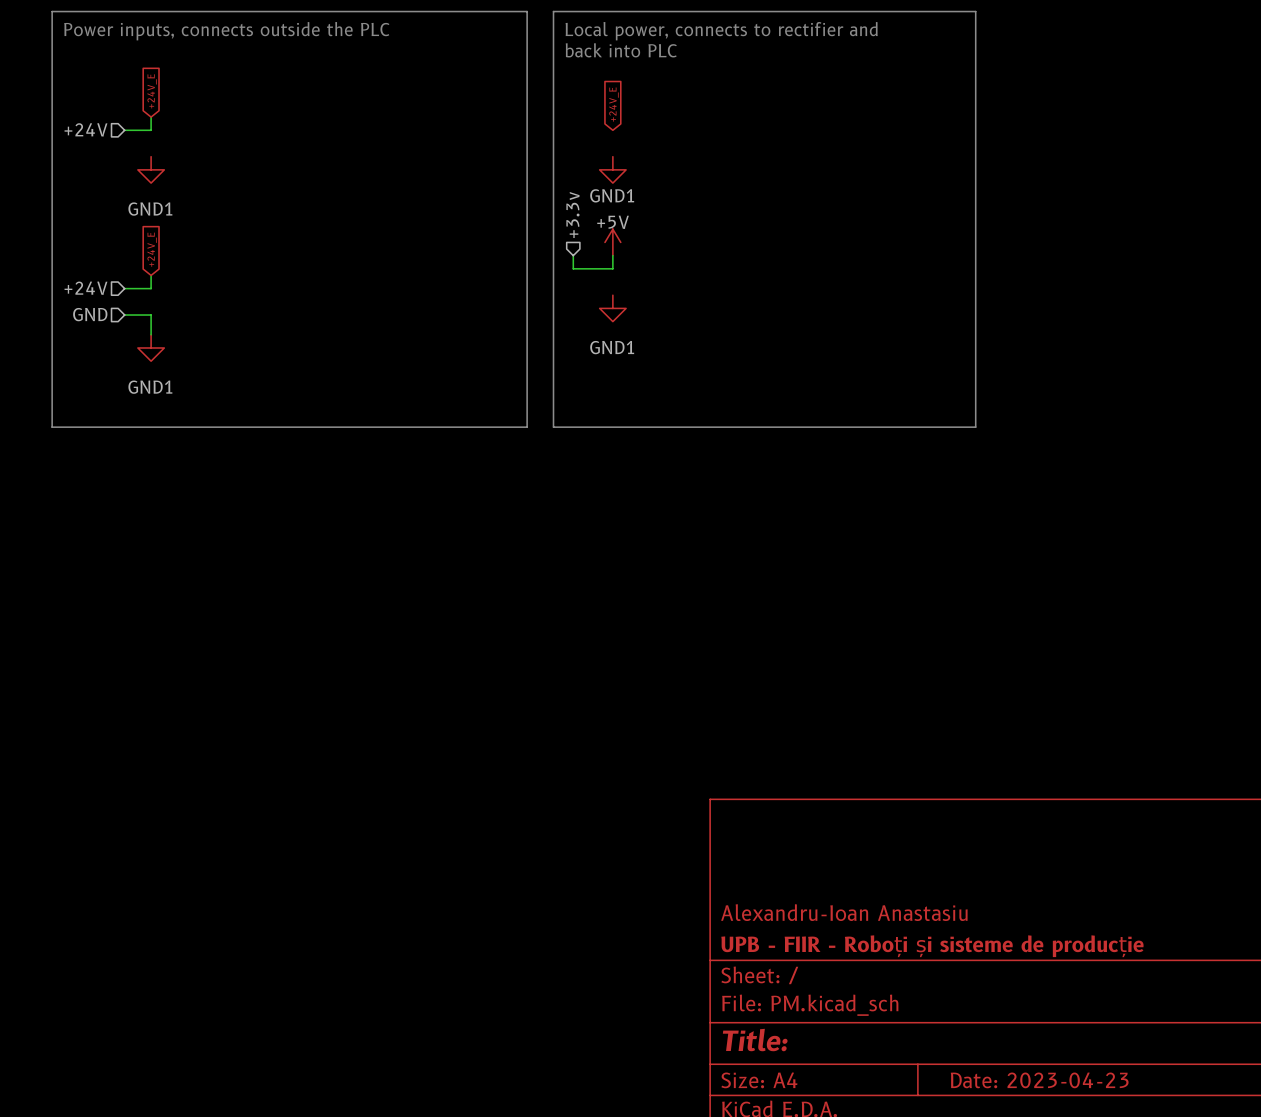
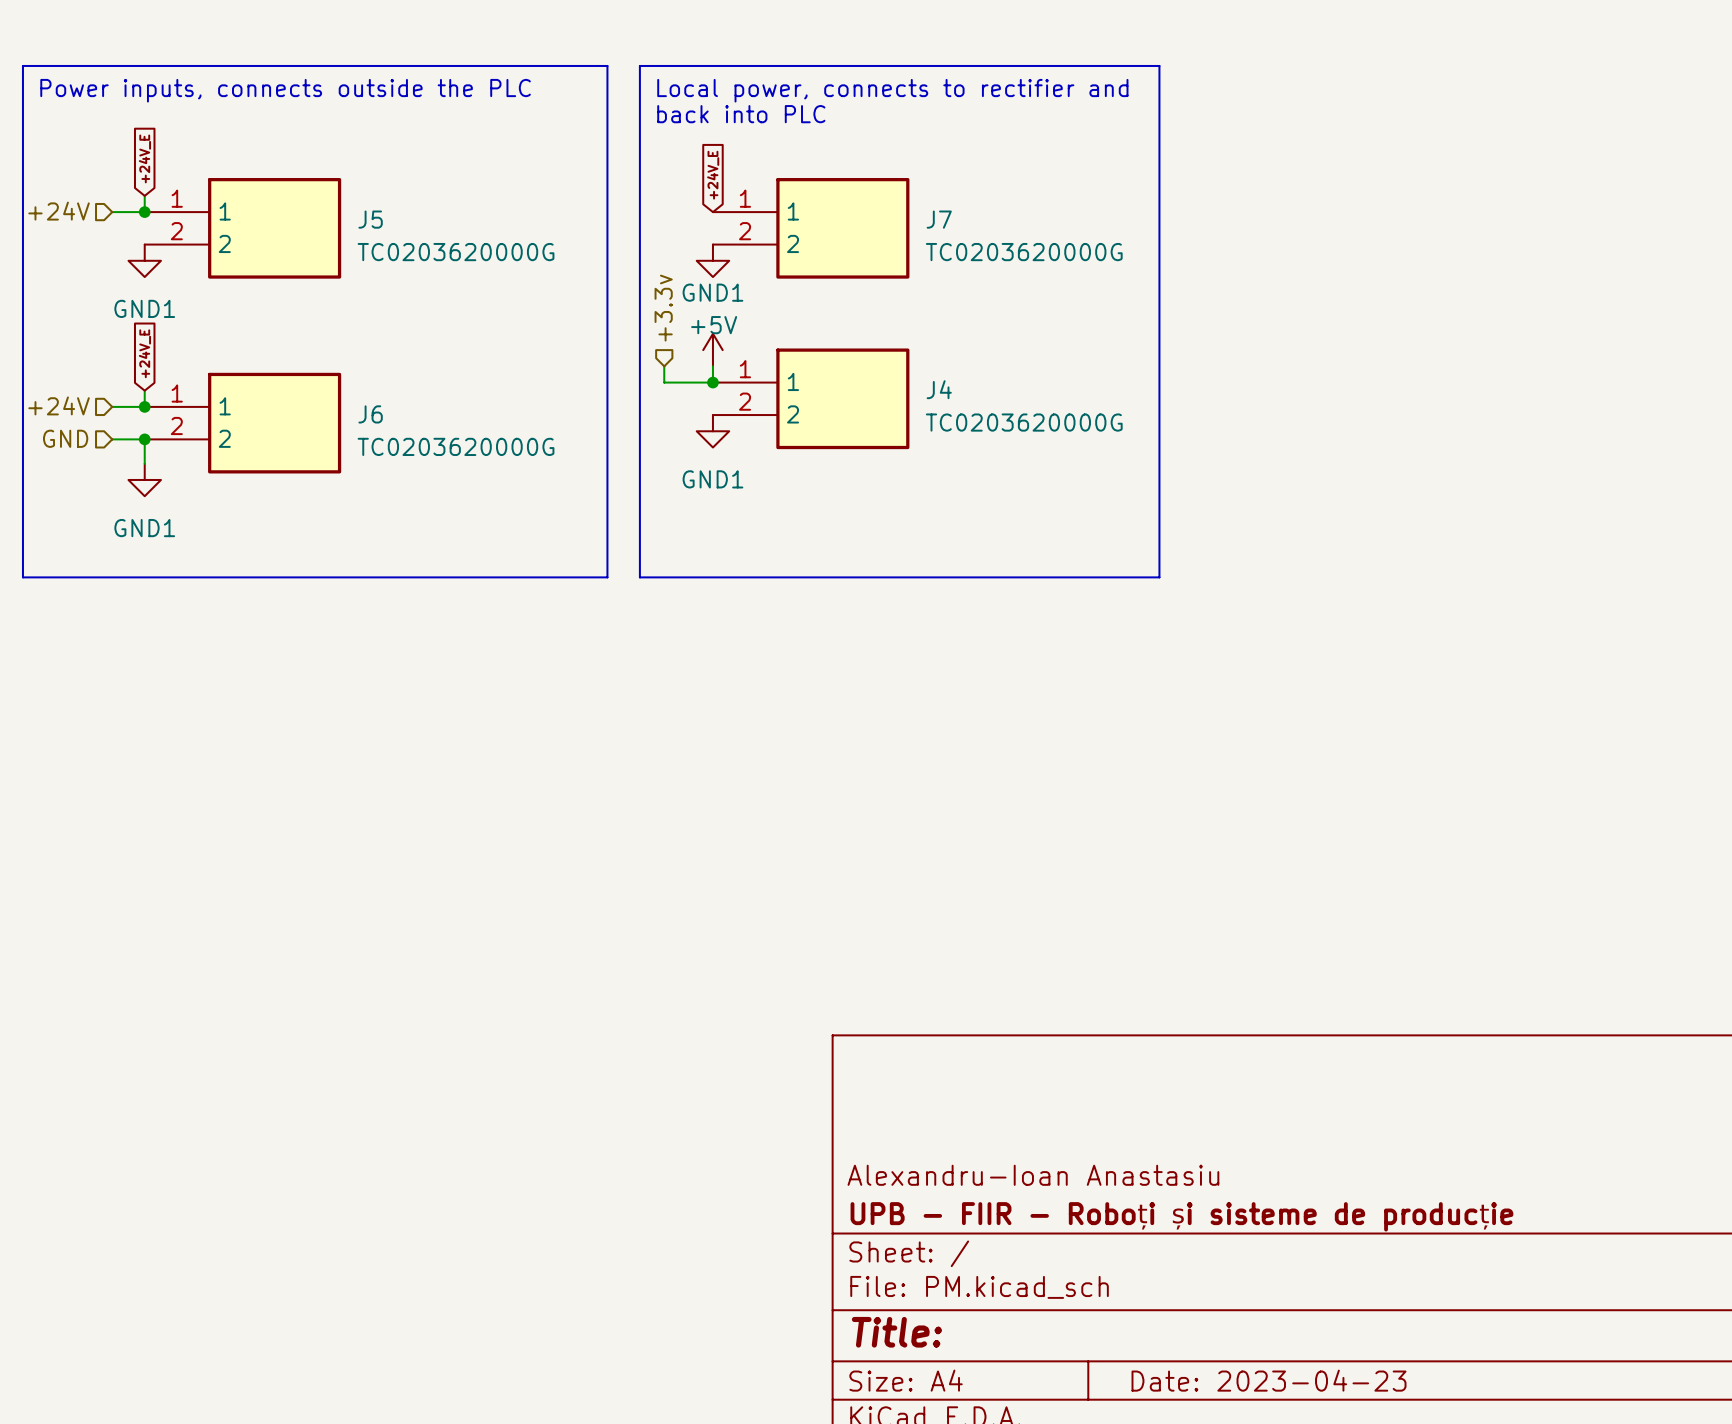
junction: none -> (144, 212)
J5: none -> TC0203620000G (242, 228)
J7: none -> TC0203620000G (811, 228)
junction: none -> (712, 382)
J4: none -> TC0203620000G (811, 398)
junction: none -> (144, 406)
J6: none -> TC0203620000G (242, 423)
junction: none -> (144, 439)

